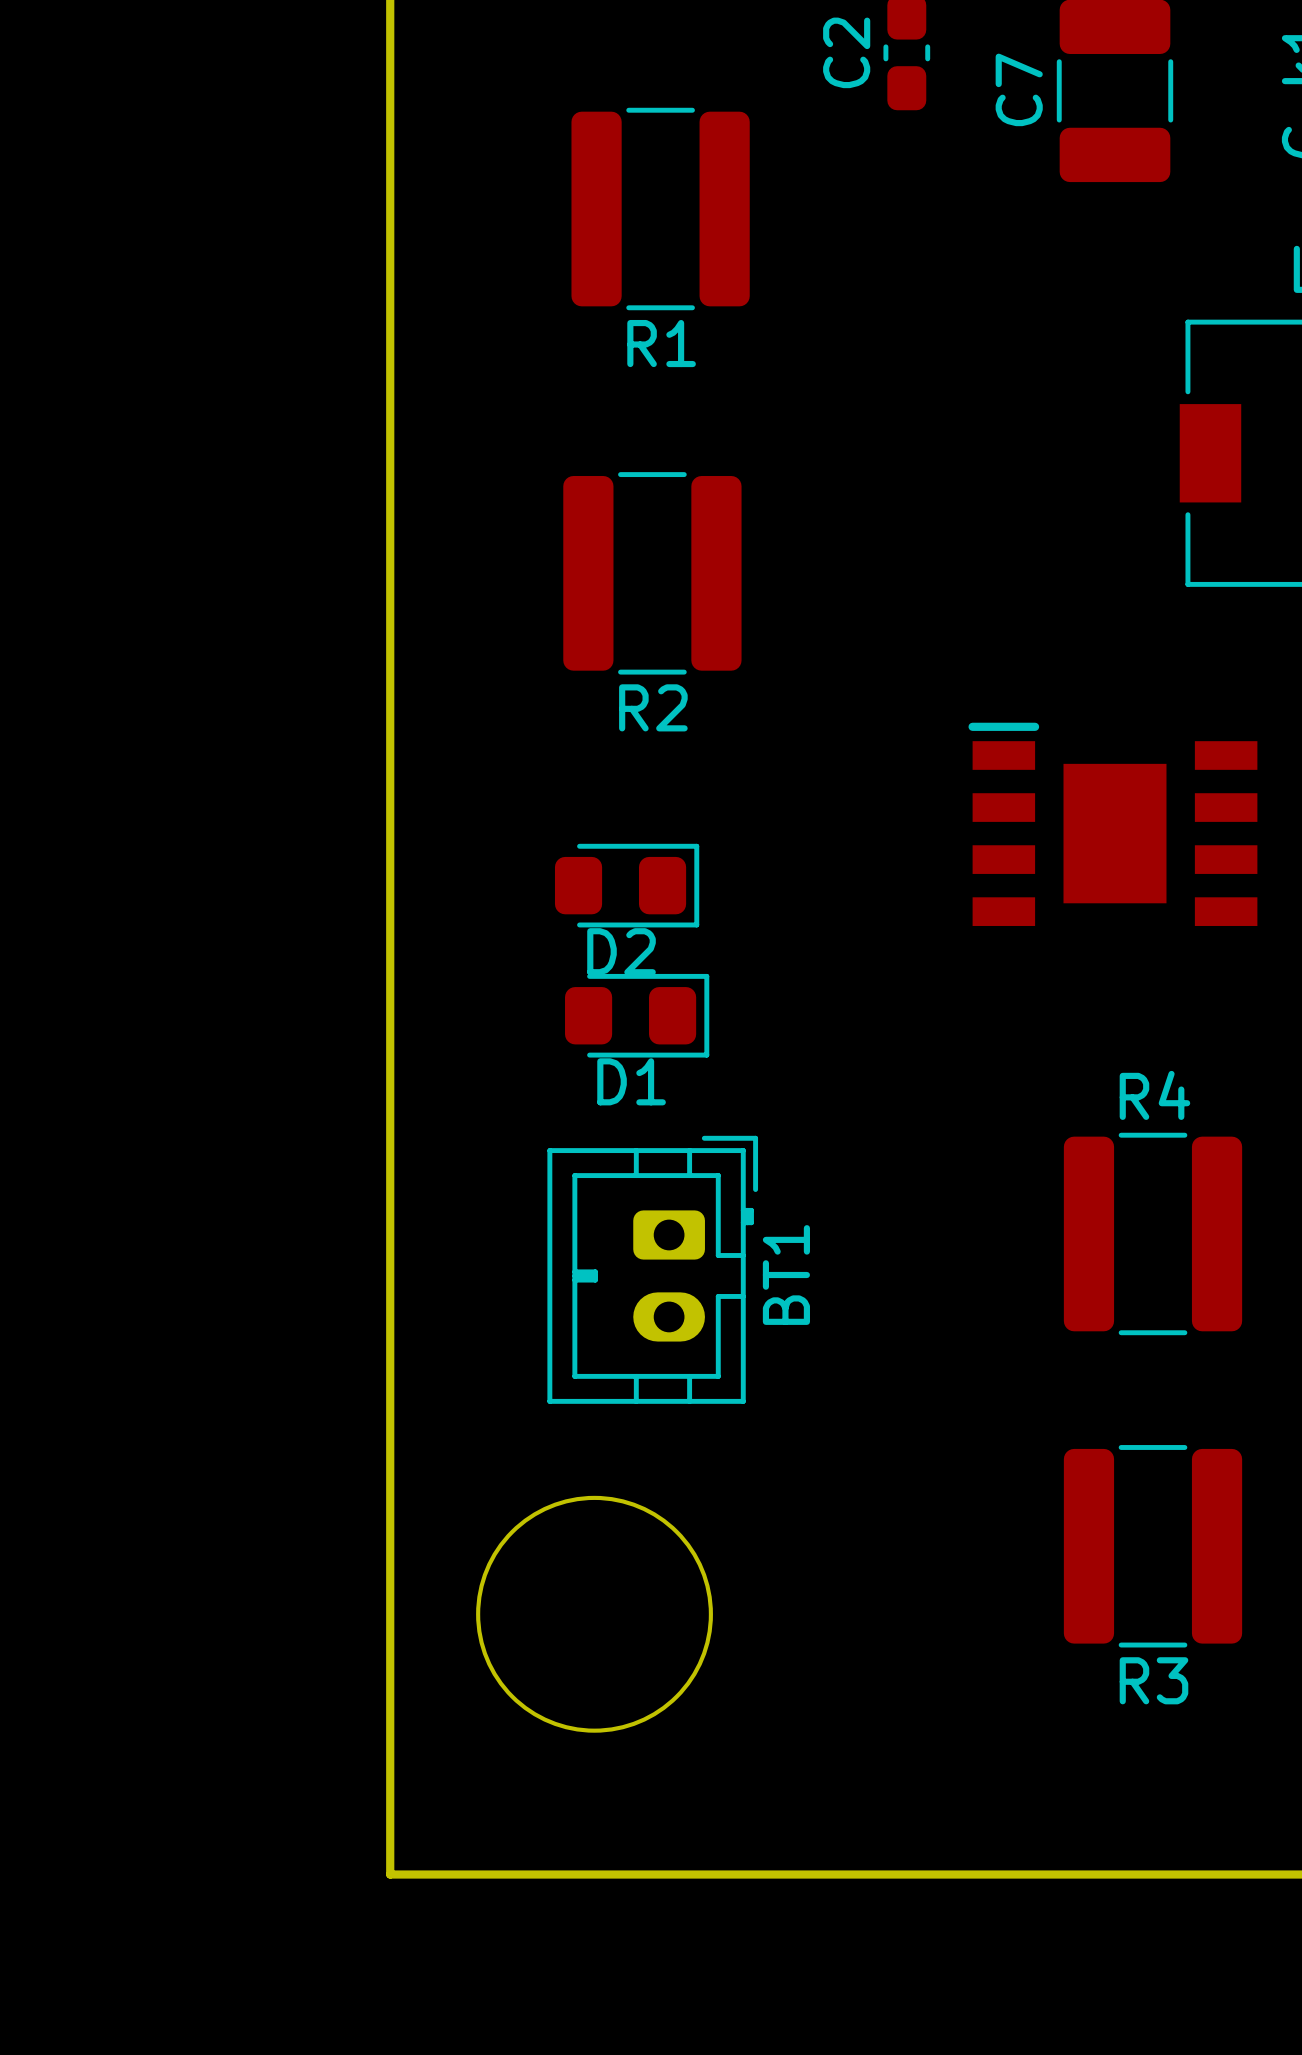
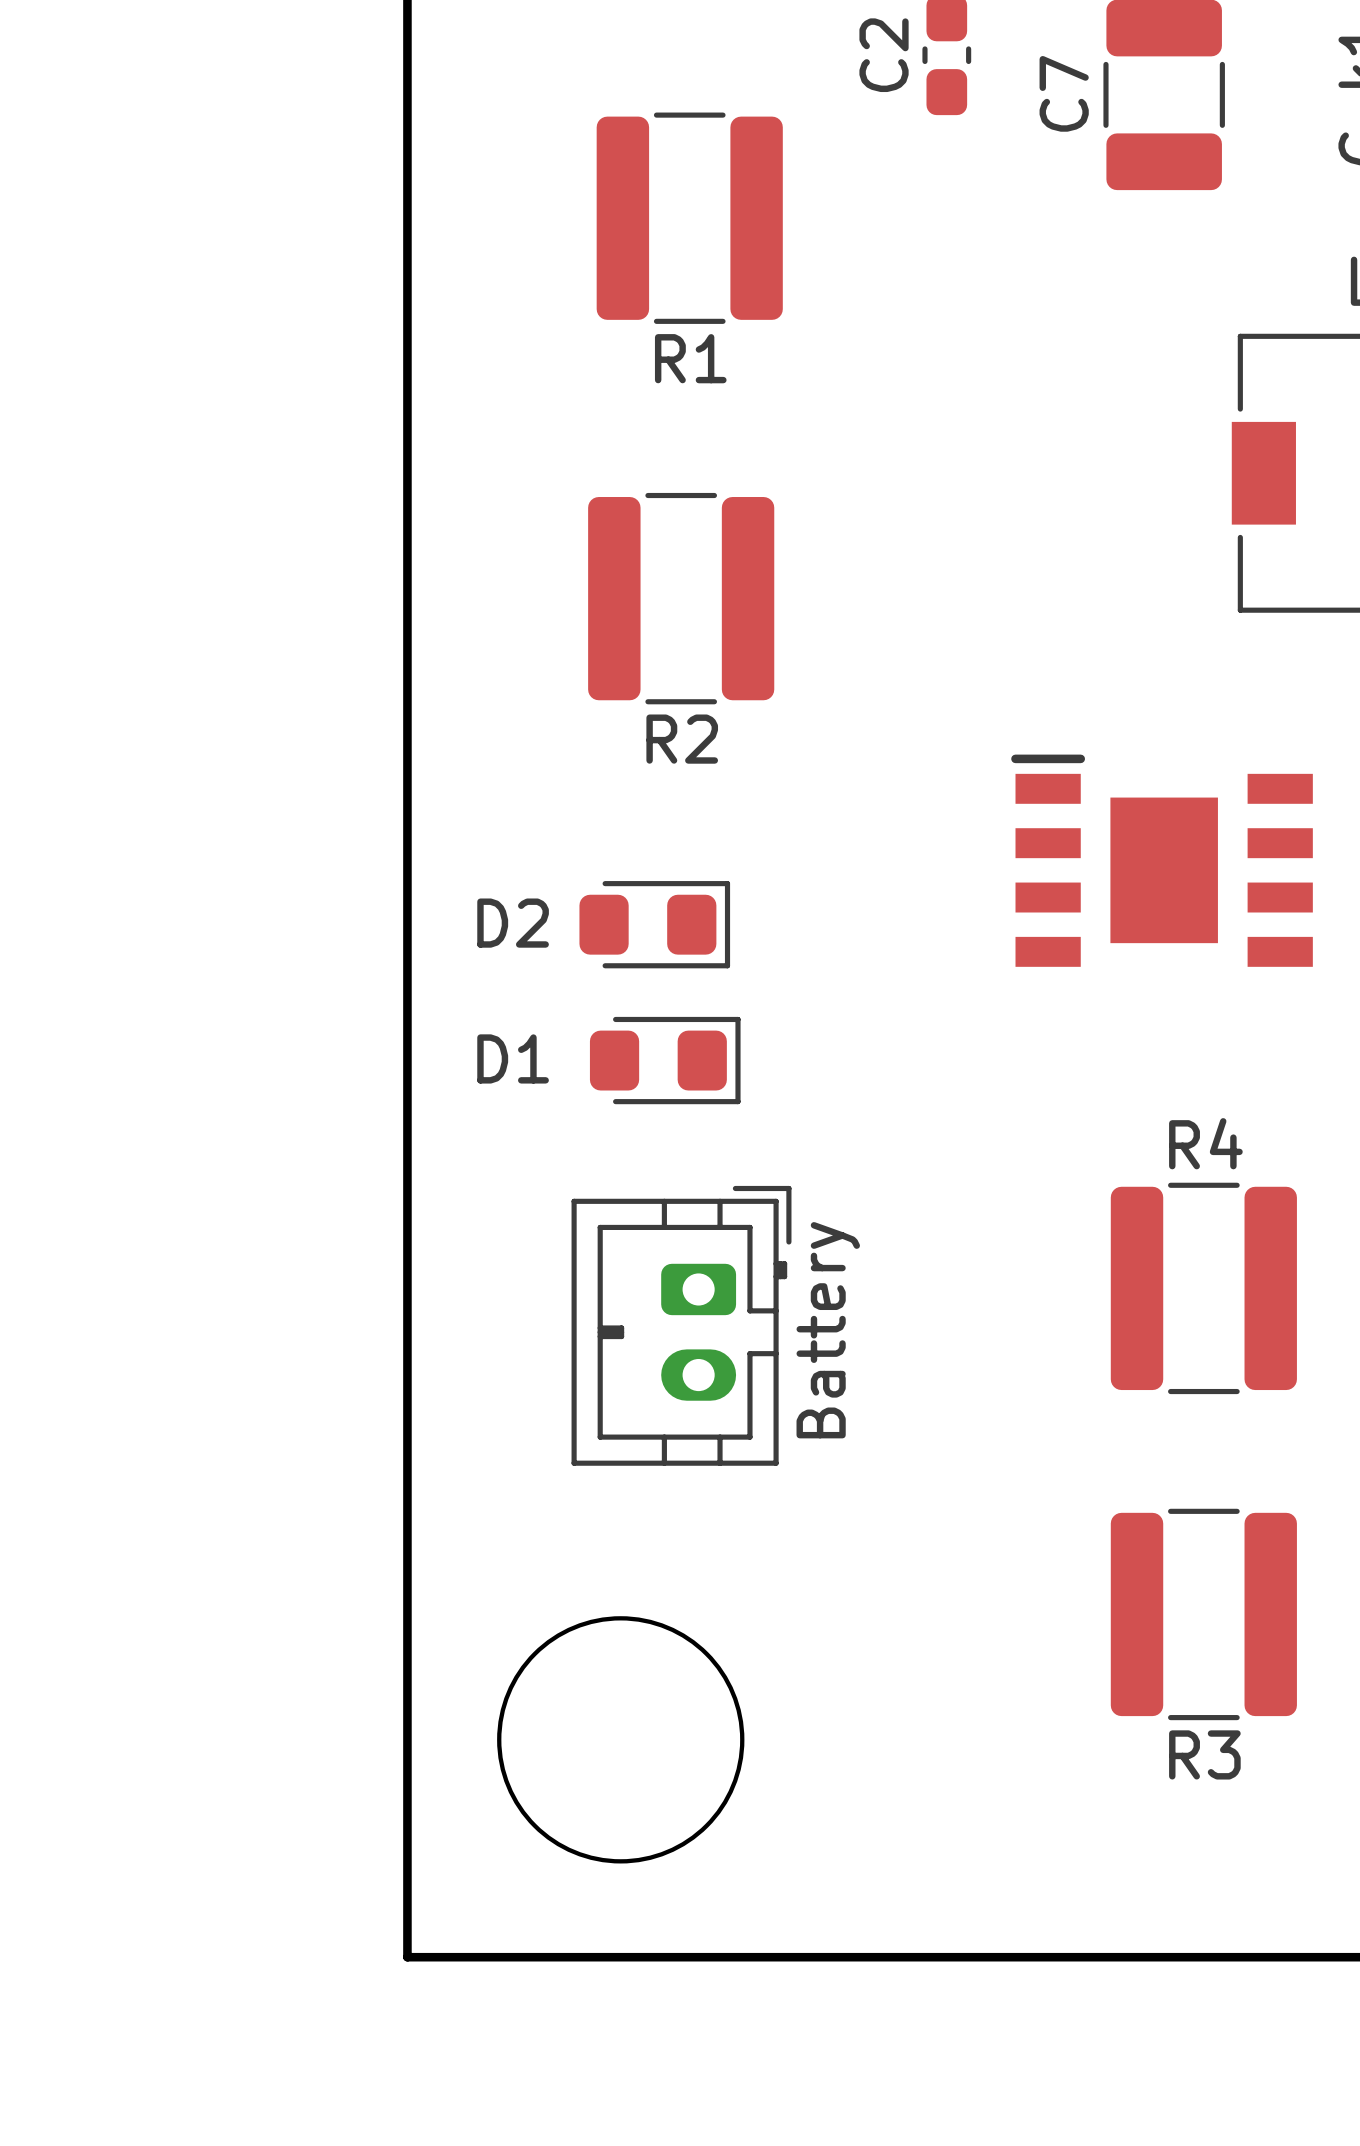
D2 name position: D2 (621, 951) -> D2 (513, 923)
D1 name position: D1 (631, 1081) -> D1 (513, 1058)
BT1 name: BT1 (786, 1275) -> Battery (828, 1330)
round board edge position: (594, 1614) -> (620, 1739)

